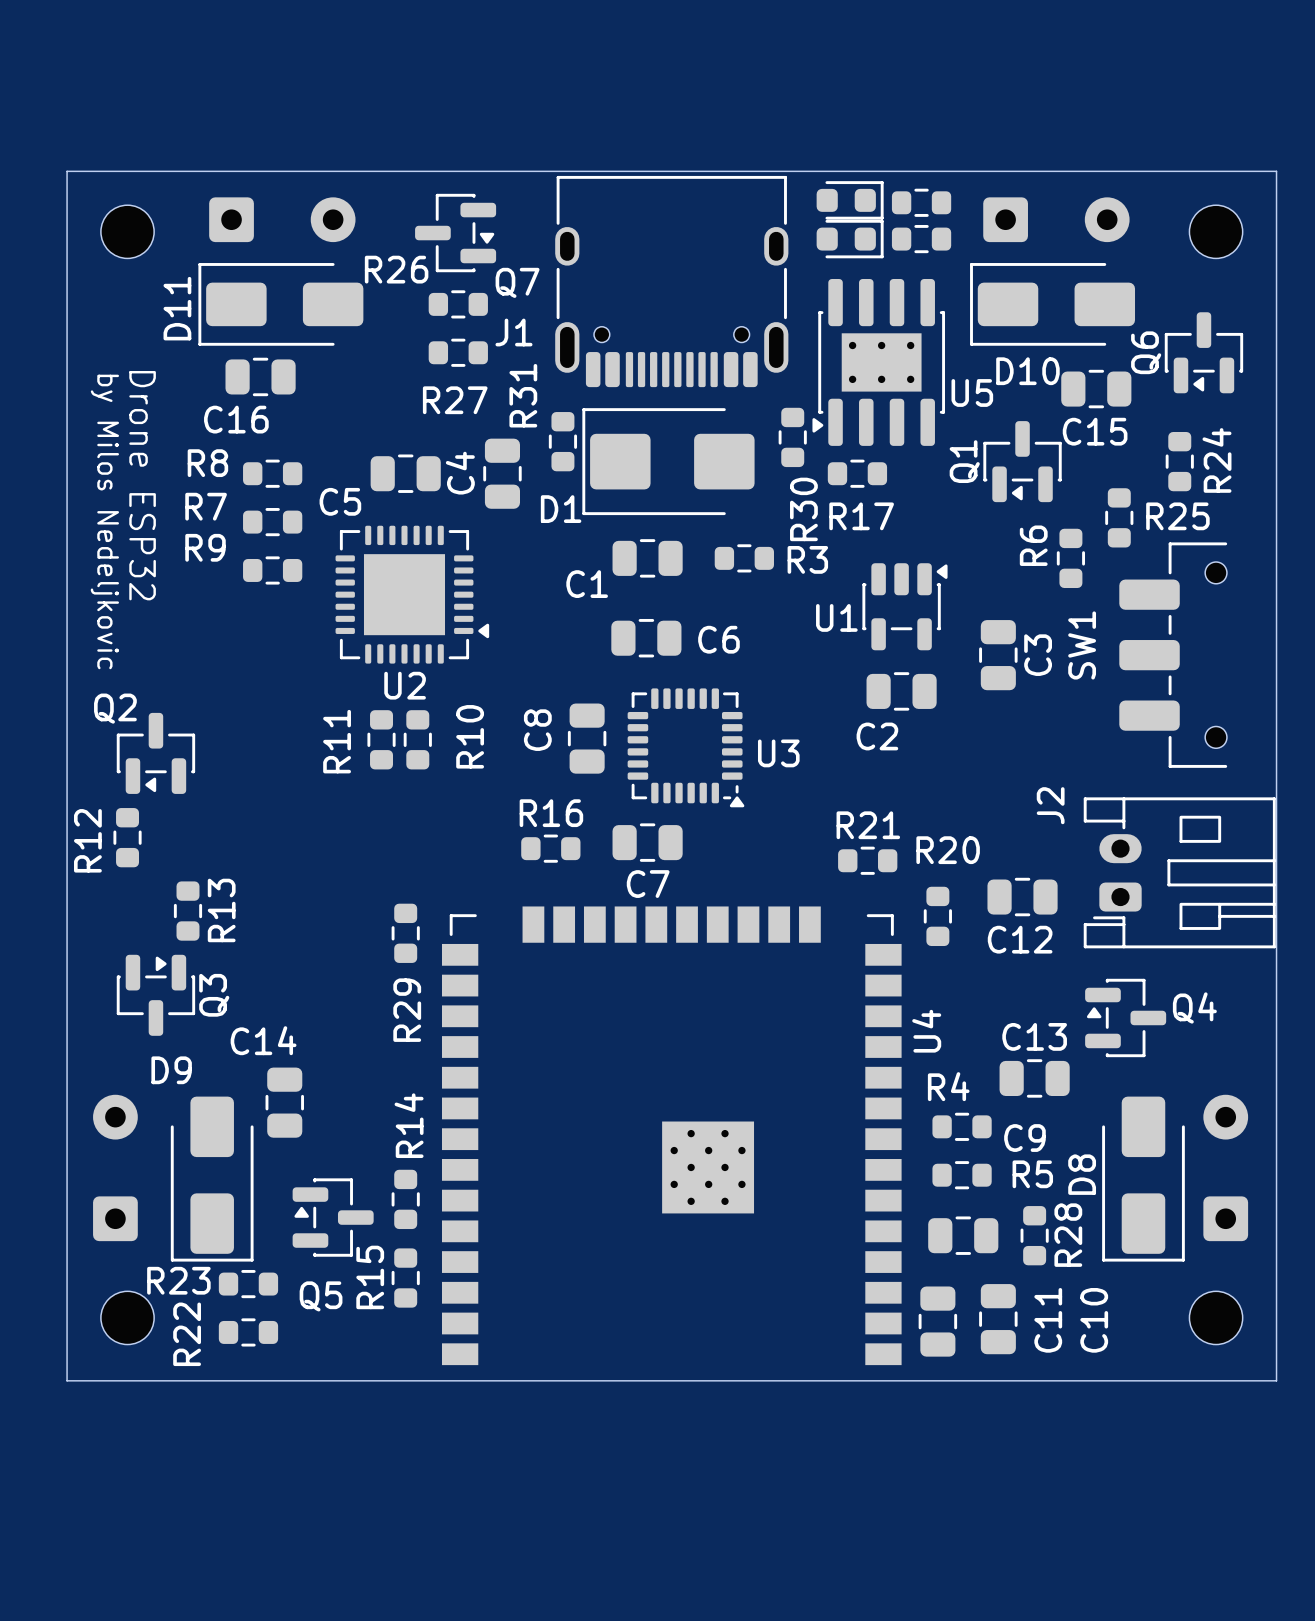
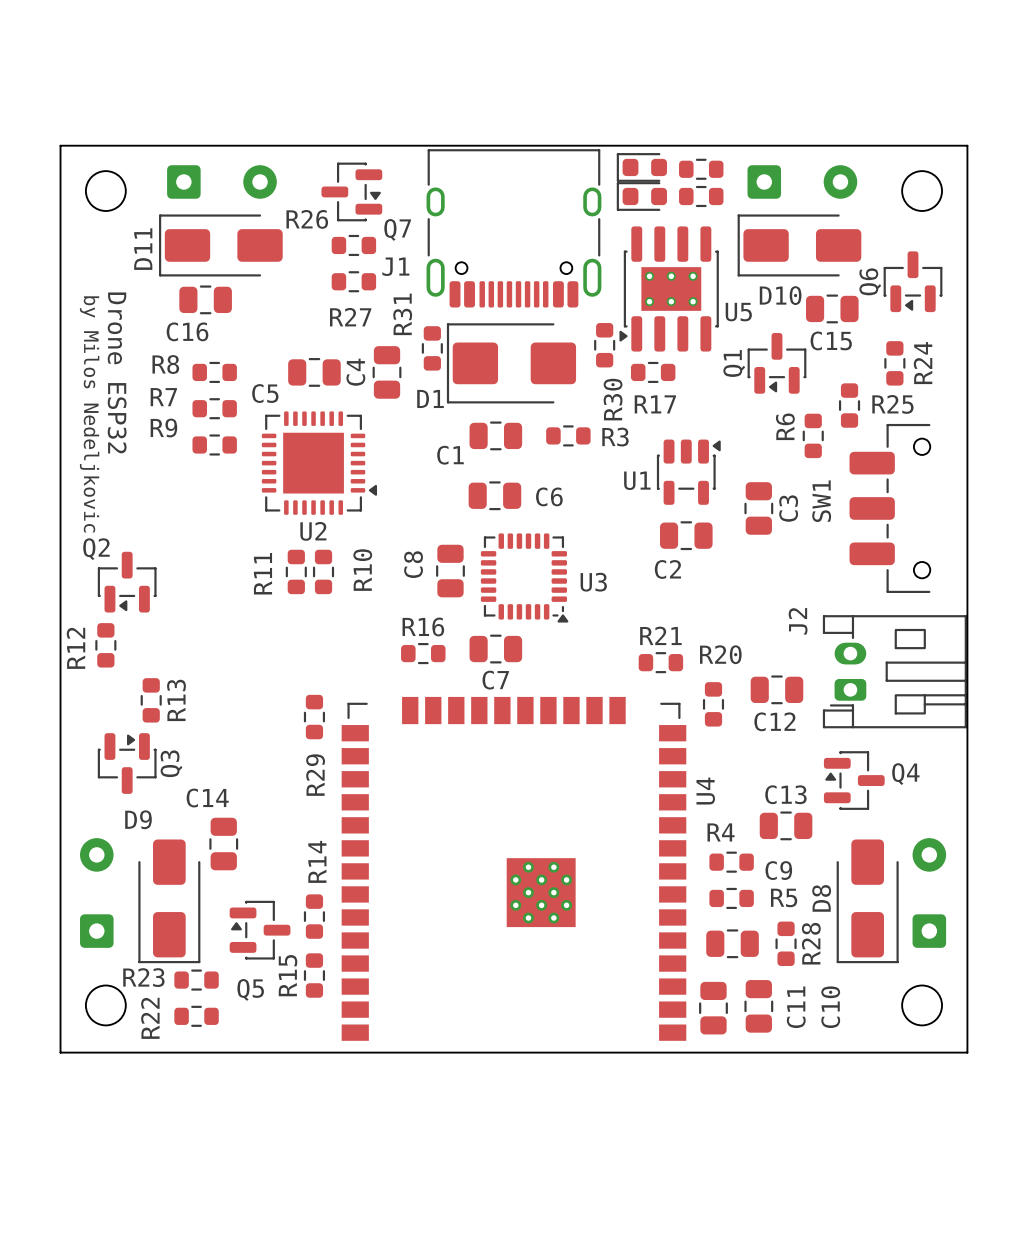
part rotation: 0° (850, 200) -> 180° (641, 167)
part rotation: 0° (850, 239) -> 180° (641, 196)

